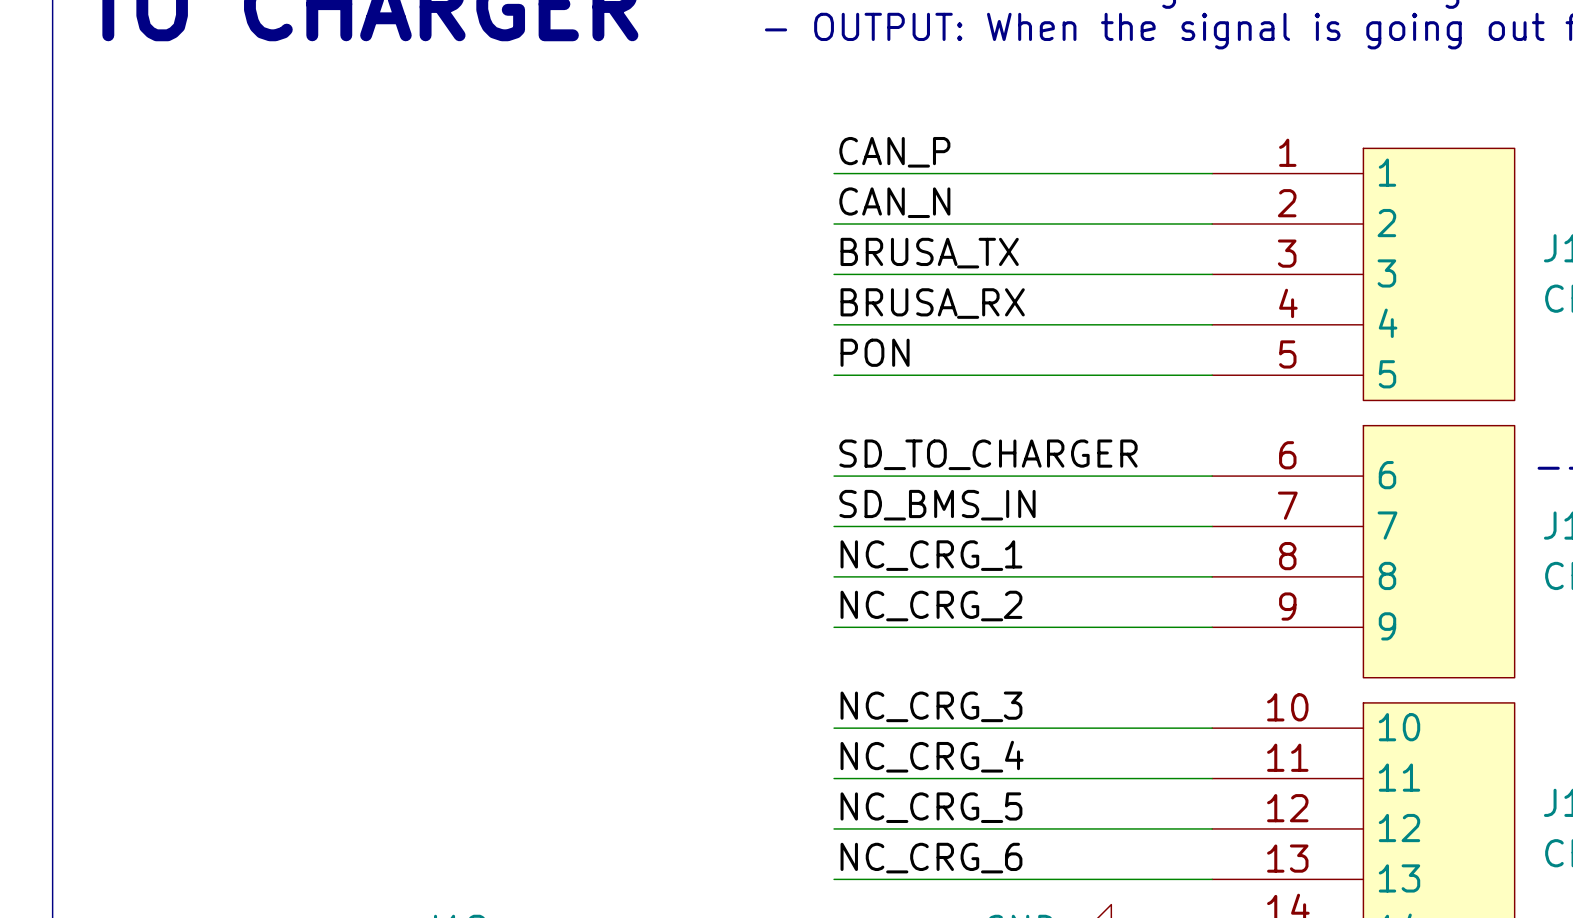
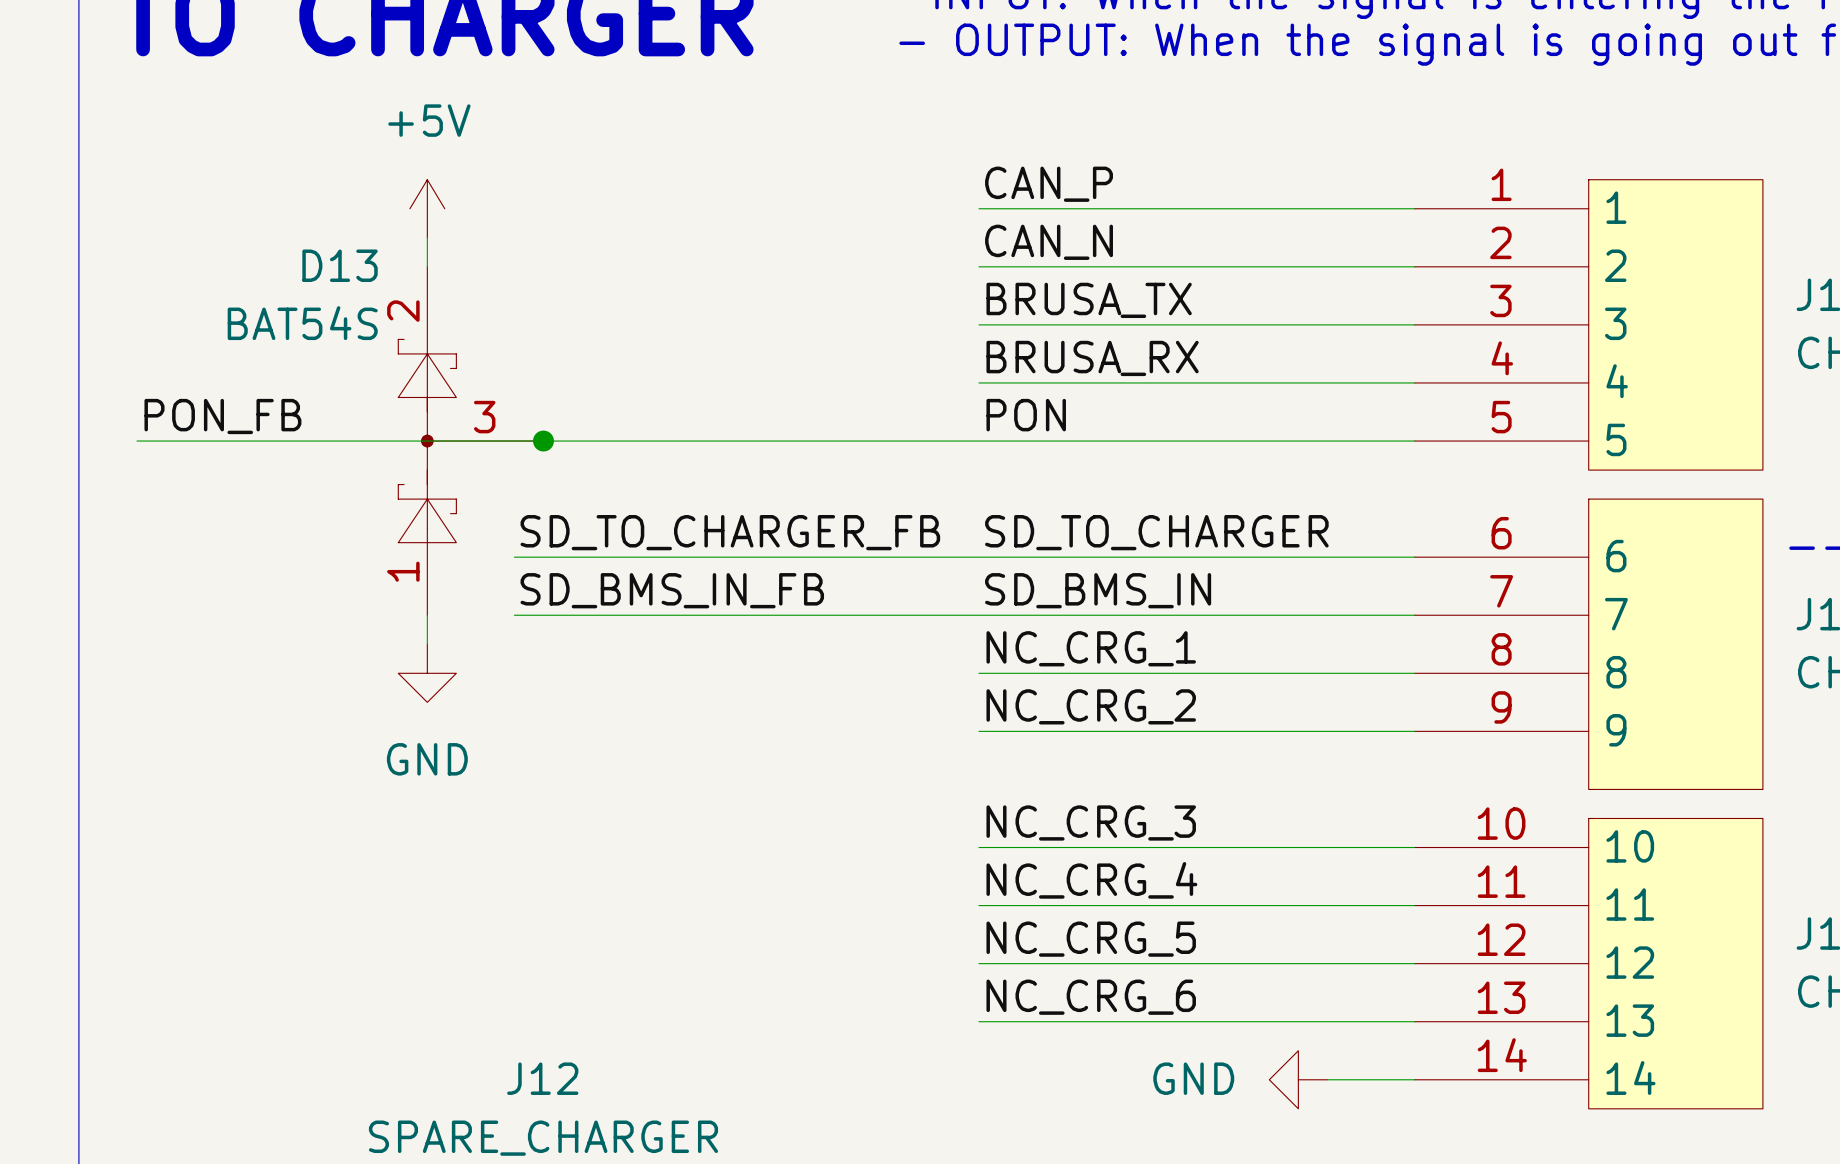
power symbol: none -> +5V (427, 208)
wire: none -> (427, 237) (427, 266)
label: none -> PON_FB (222, 416)
wire: none -> (137, 441) (978, 441)
D13: none -> BAT54S (470, 441)
junction: none -> (543, 441)
label: none -> SD_TO_CHARGER_FB (730, 532)
wire: none -> (514, 557) (978, 557)
label: none -> SD_BMS_IN_FB (672, 590)
wire: none -> (427, 615) (427, 644)
wire: none -> (514, 615) (978, 615)
power symbol: none -> GND (427, 673)

